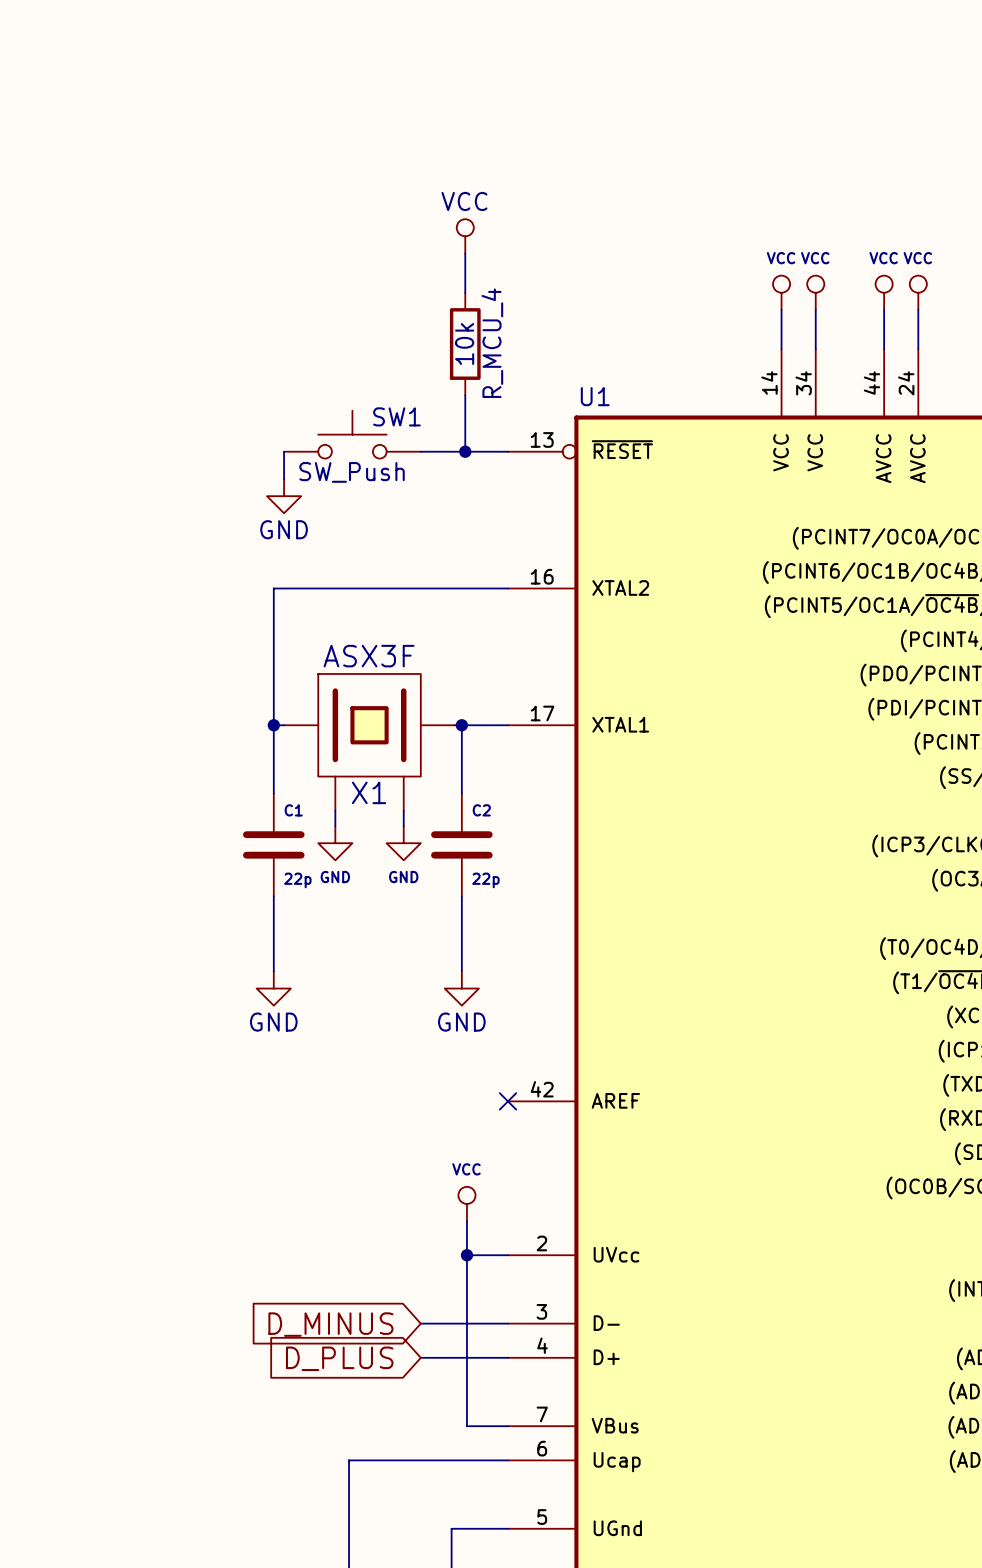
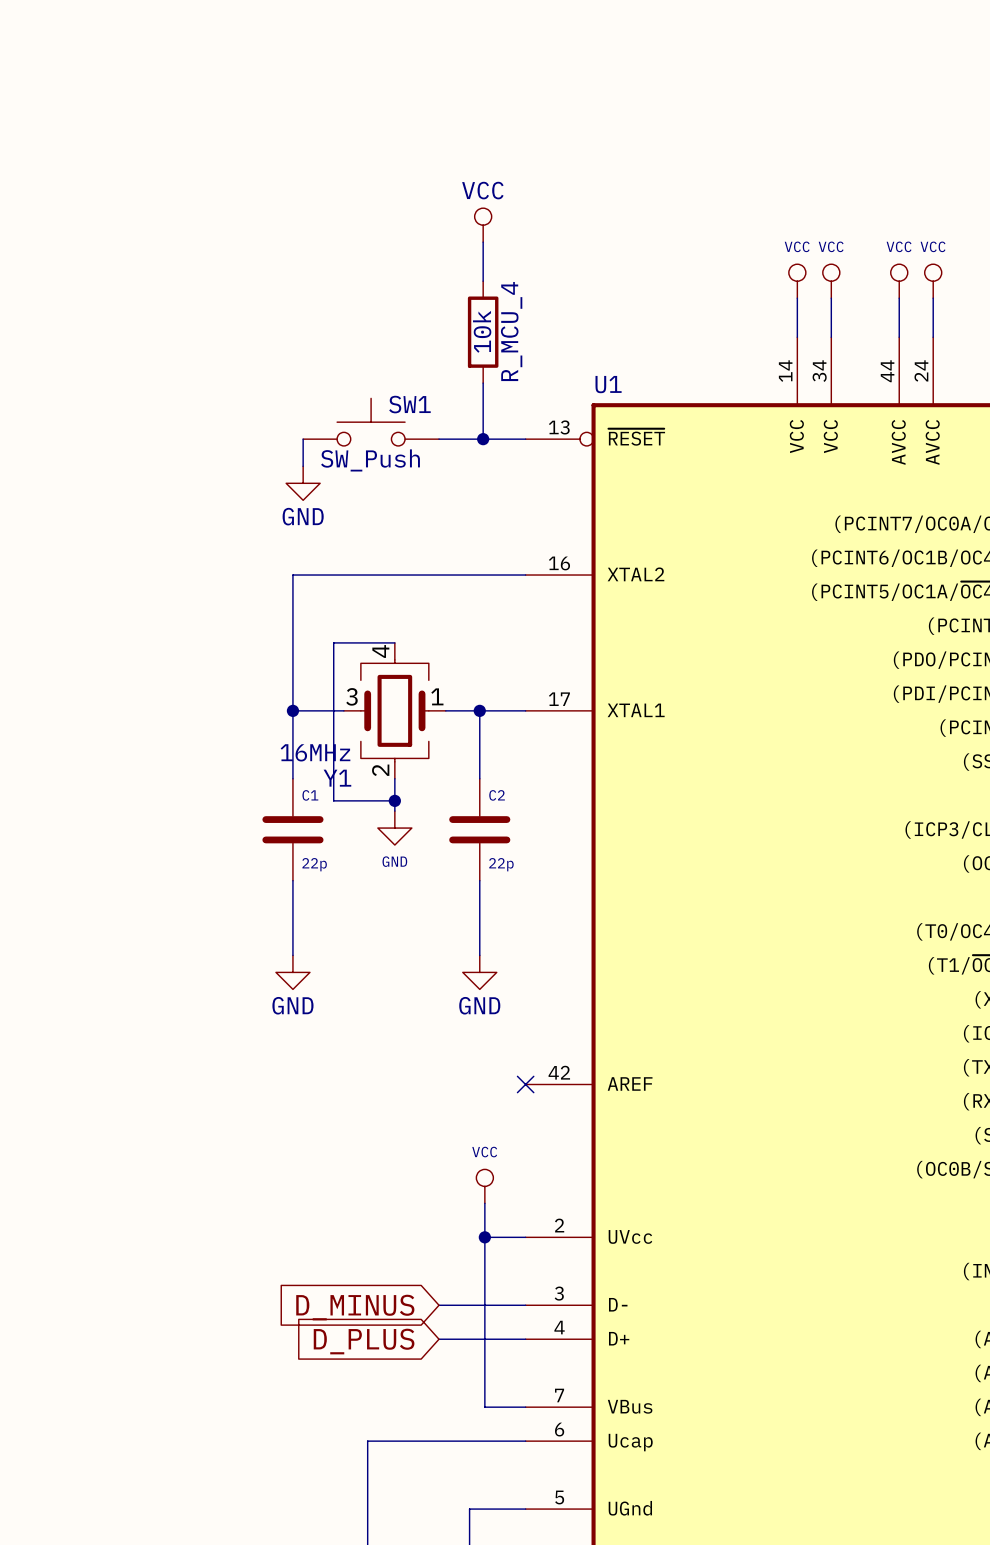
wire: none -> (394, 642) (333, 642) (333, 800) (394, 800)
Y1: none -> 16MHz (394, 710)
X1: ASX3F (369, 742) -> none
wire: none -> (394, 778) (394, 811)
wire: (335, 810) (335, 826) -> none
wire: (403, 810) (403, 826) -> none
junction: none -> (394, 800)
power symbol: GND (335, 843) -> none
power symbol: none -> GND (394, 828)
power symbol: GND (403, 843) -> none

